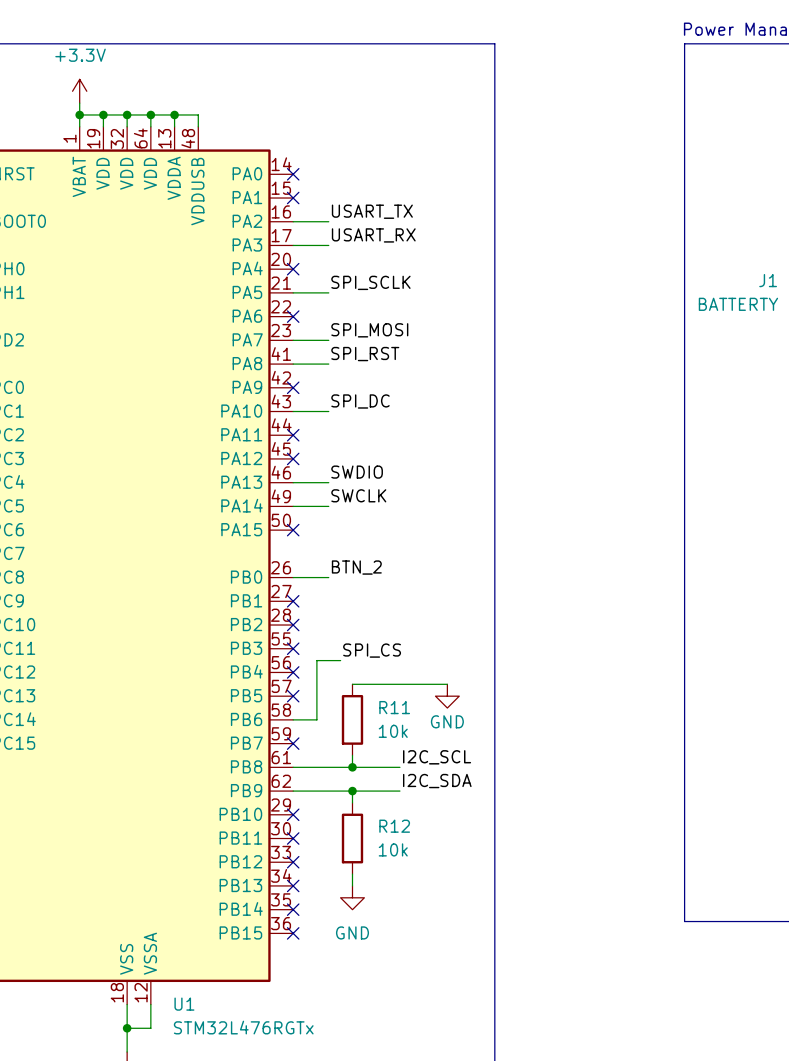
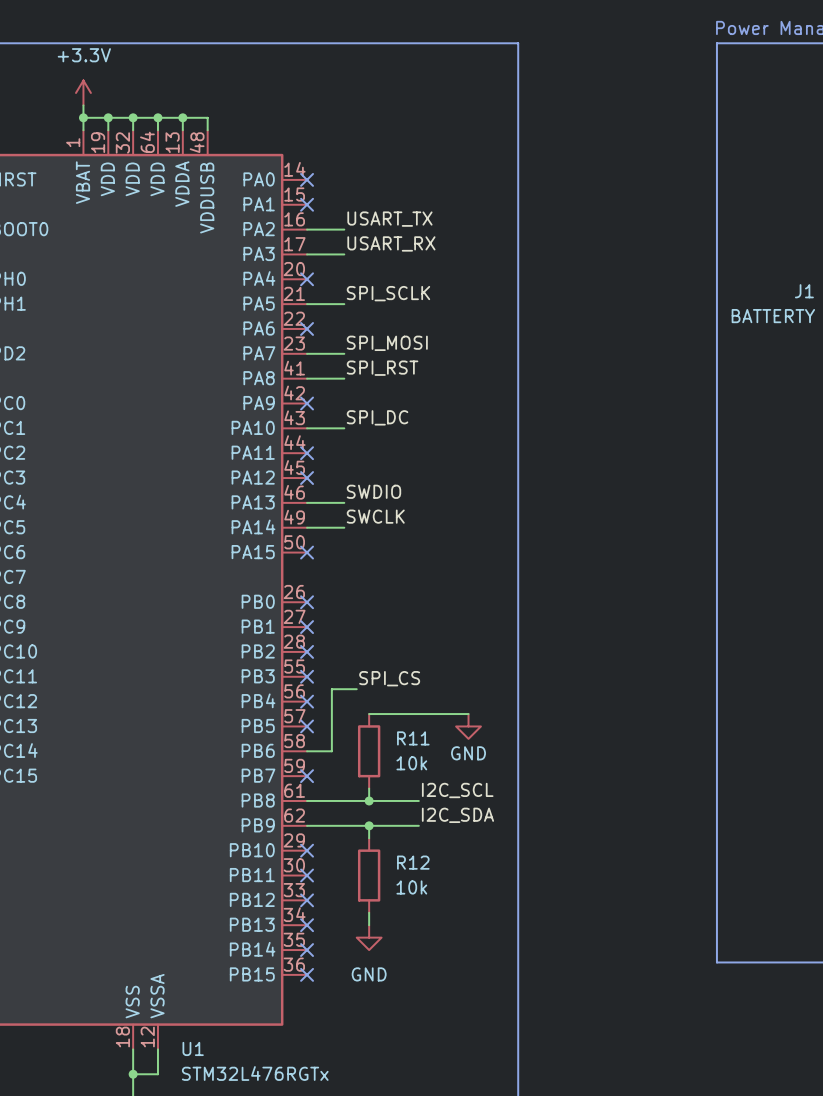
label: BTN_2 (356, 567) -> none
wire: (293, 577) (328, 577) -> none
no-connect mark: none -> (307, 602)

